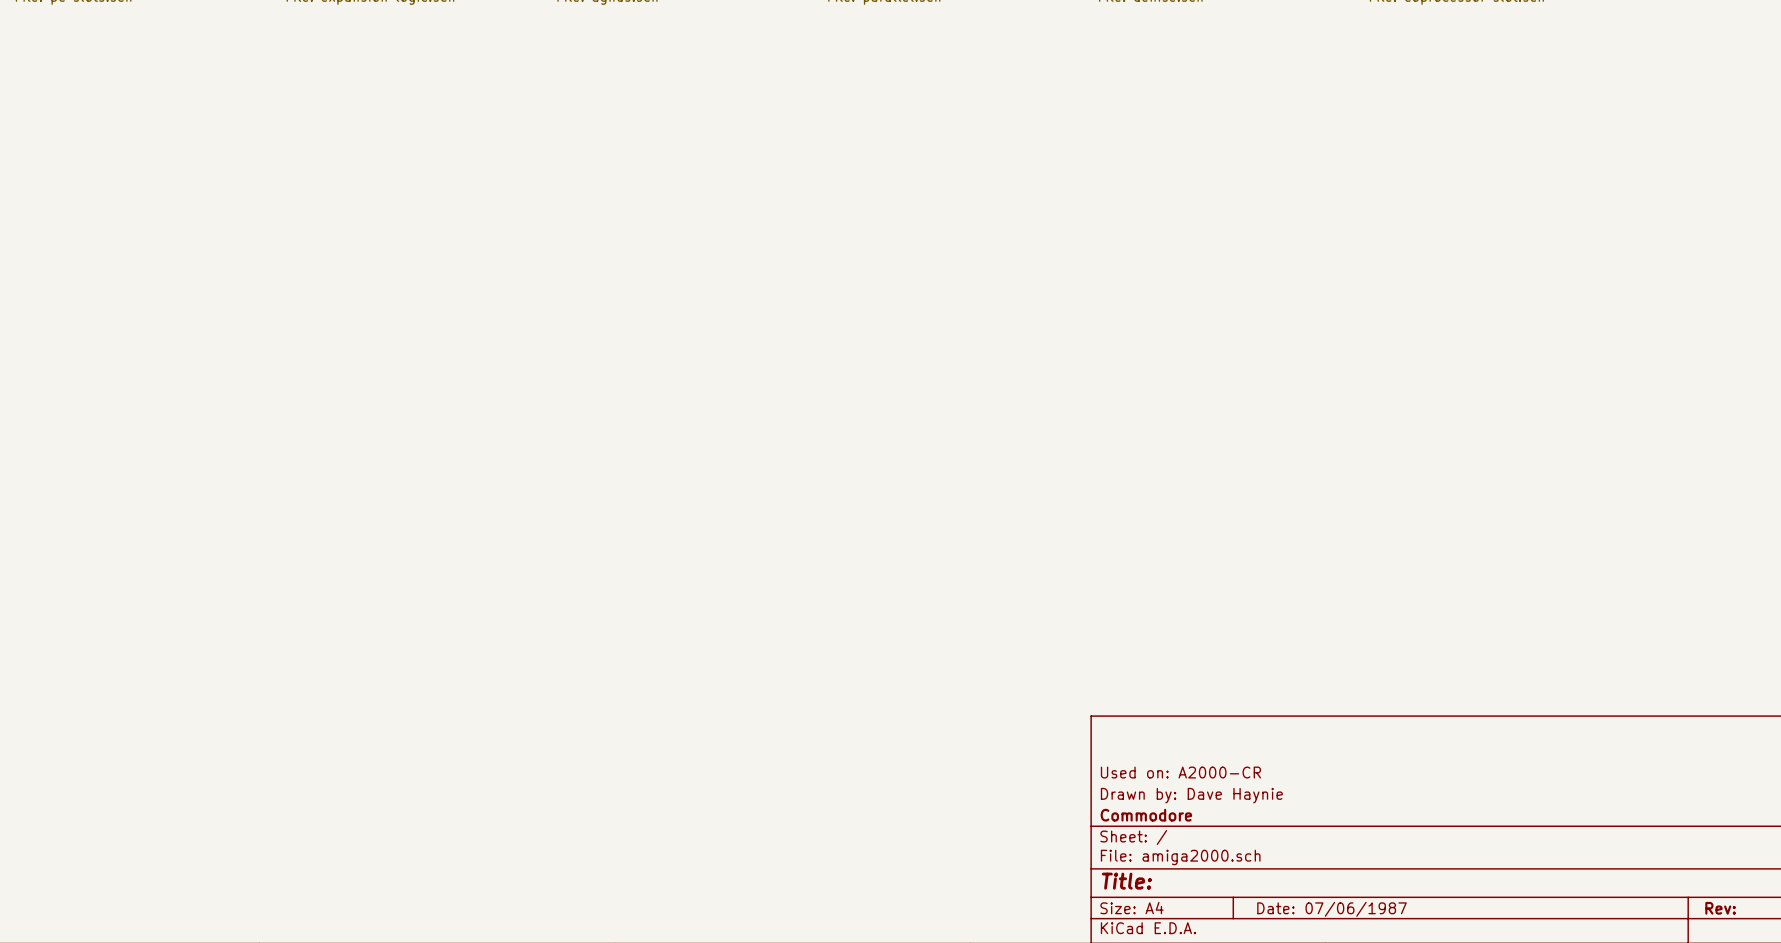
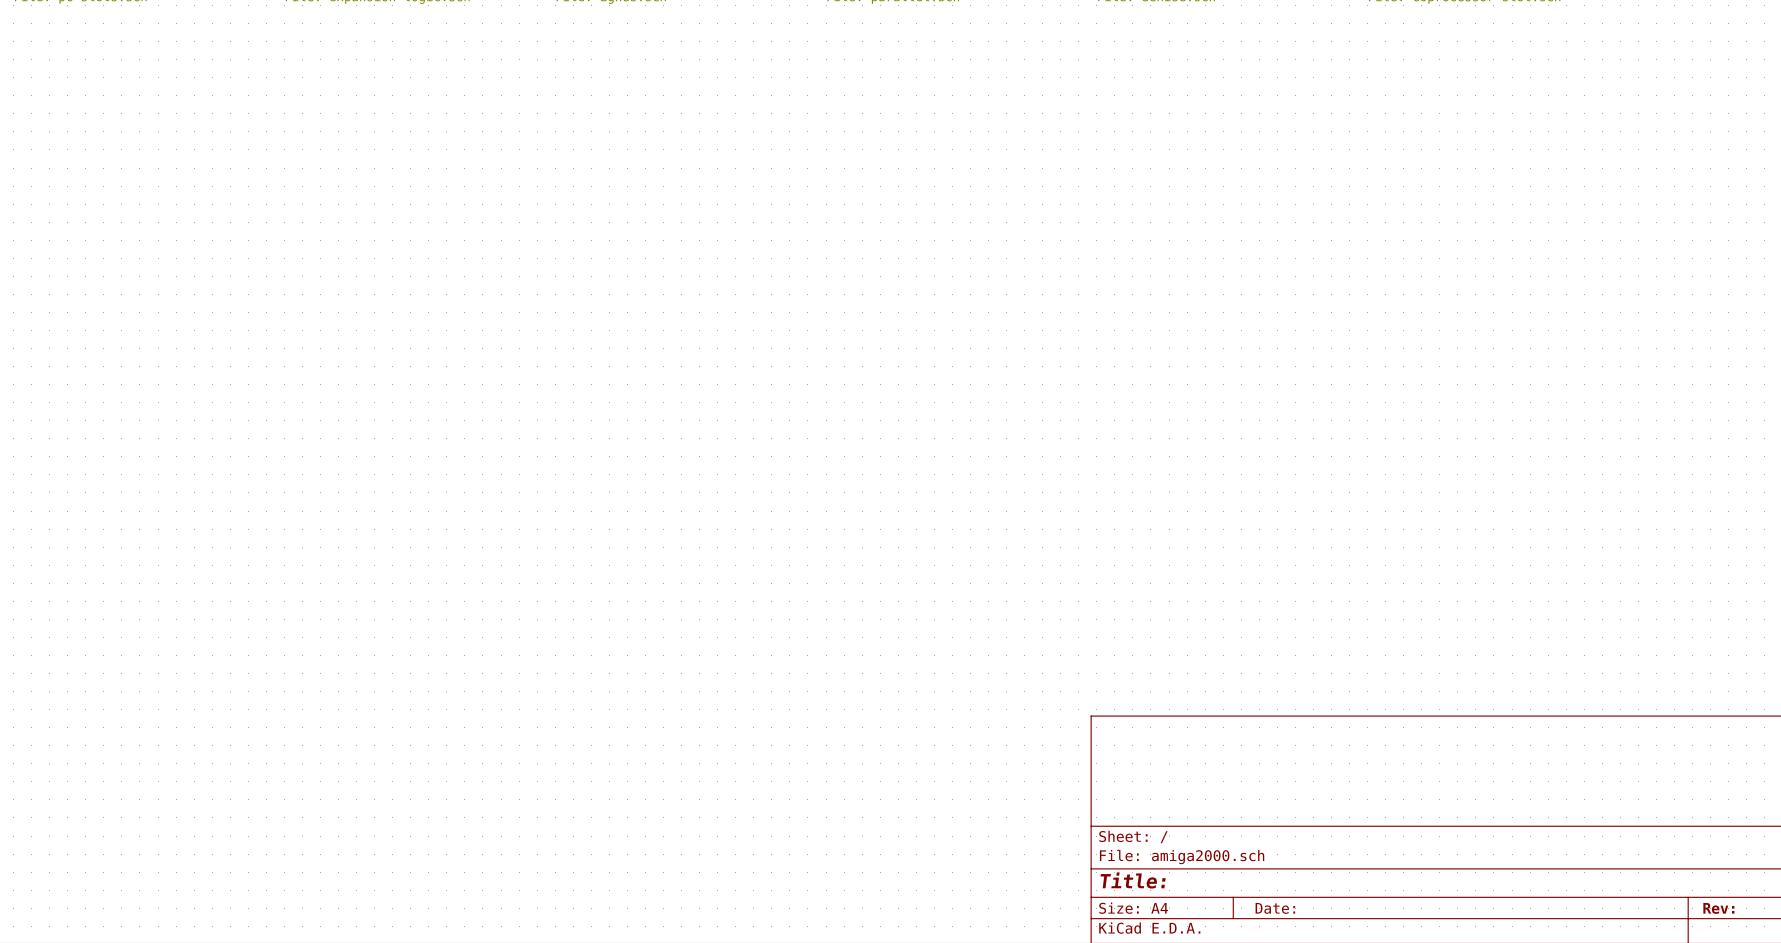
title block: Used on: A2000-CR (1180, 772) -> none
title block: Drawn by: Dave Haynie (1191, 795) -> none
title block: Commodore (1146, 815) -> none
title block: Date: 07/06/1987 (1331, 909) -> Date: (1275, 908)

